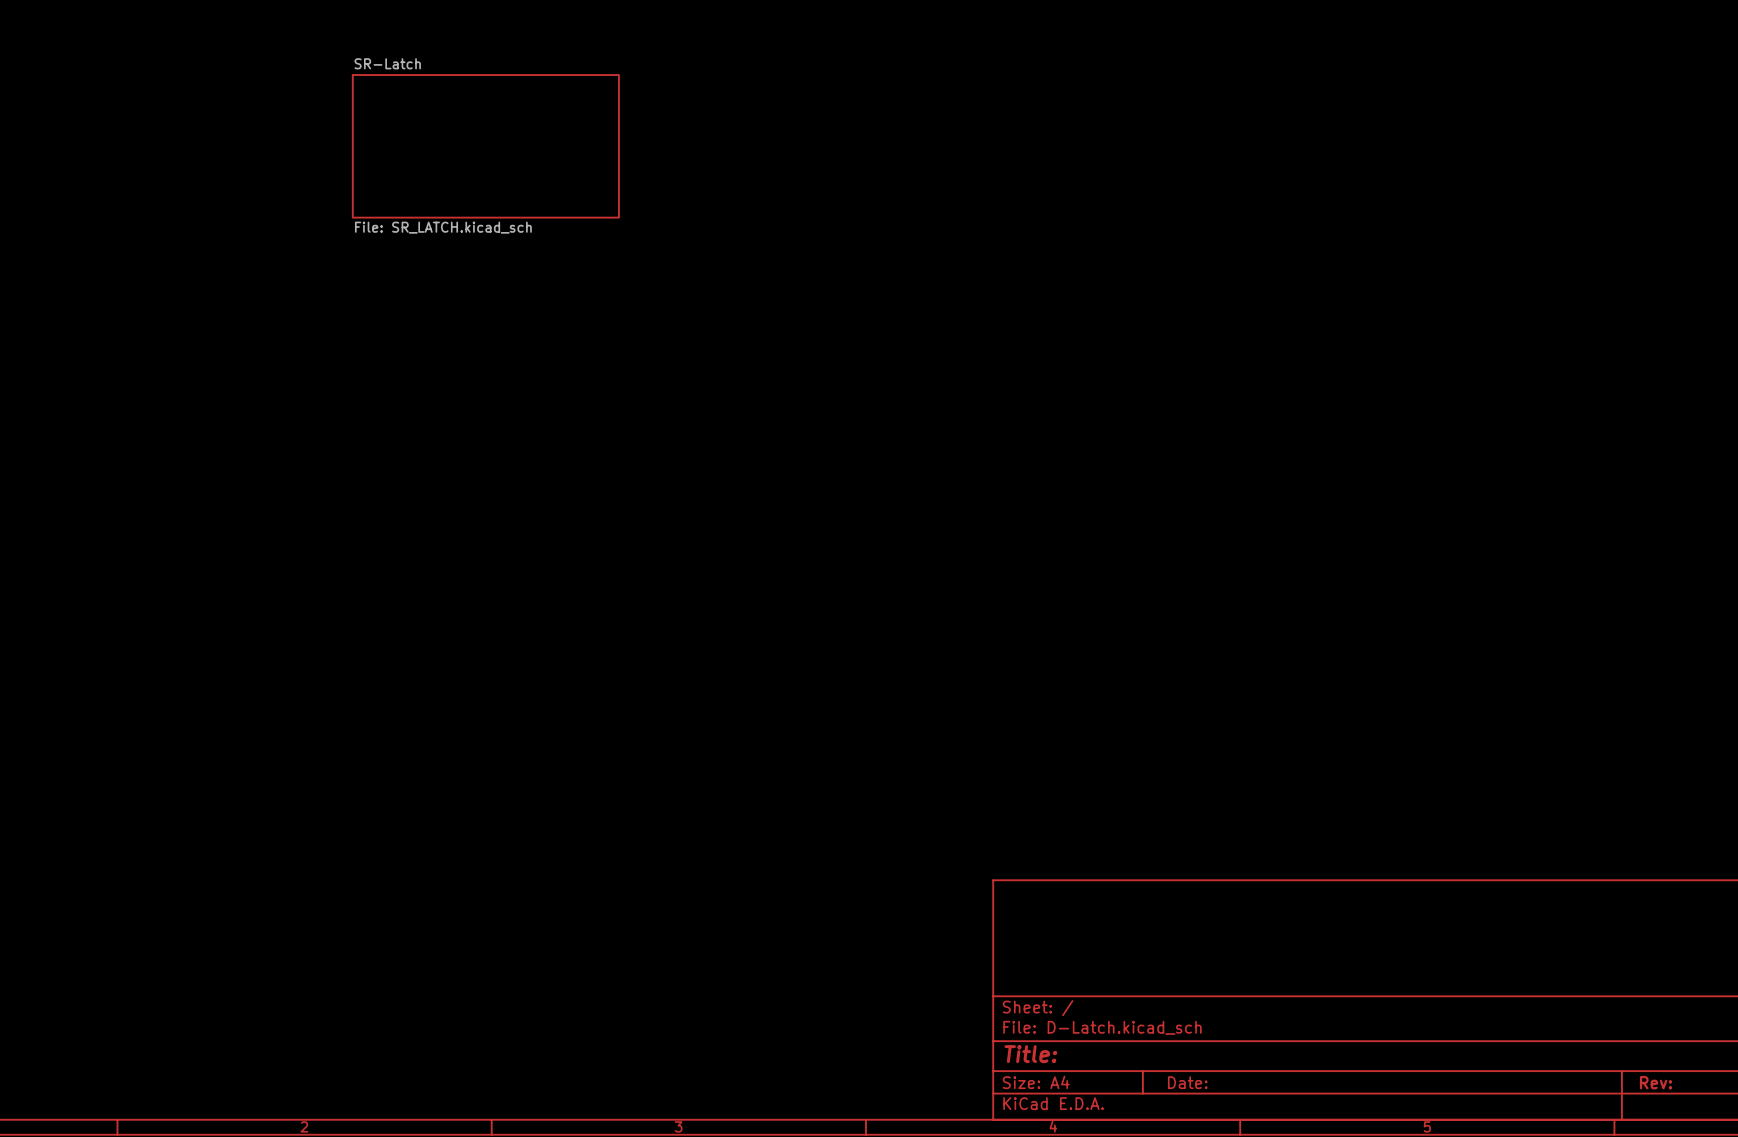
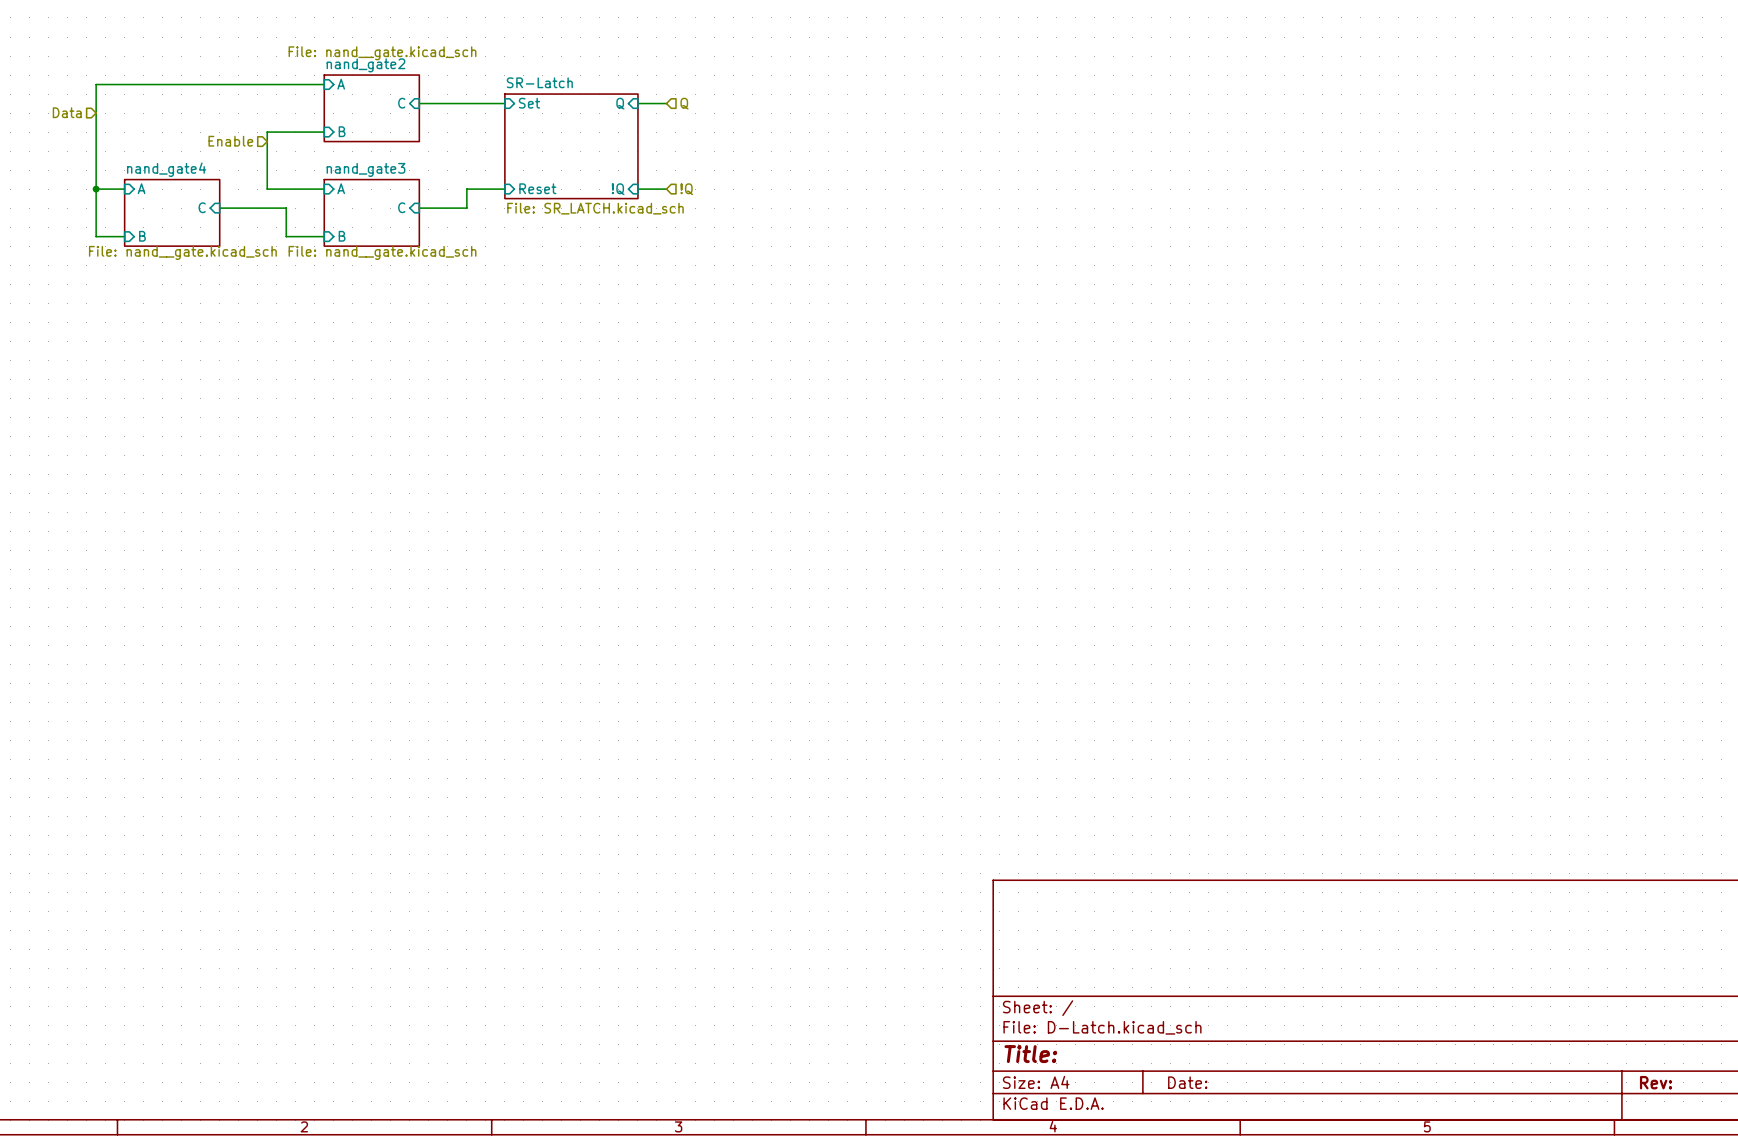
wire: none -> (324, 84) (96, 84) (96, 236) (124, 236)
sheet pin: none -> A (341, 84)
sheet pin: none -> C (401, 103)
wire: none -> (419, 103) (504, 103)
sheet pin: none -> Set (529, 103)
sheet pin: none -> Q (620, 103)
wire: none -> (637, 103) (666, 103)
hierarchical label: none -> Q (684, 103)
sheet nand_gate2: none -> File: nand__gate.kicad_sch (371, 108)
hierarchical label: none -> Data (67, 112)
sheet pin: none -> B (342, 131)
wire: none -> (324, 132) (267, 132) (267, 189) (324, 189)
hierarchical label: none -> Enable (230, 141)
sheet SR-Latch: File: SR_LATCH.kicad_sch (485, 146) -> none
sheet SR-Latch: none -> File: SR_LATCH.kicad_sch (571, 146)
sheet pin: none -> A (141, 188)
sheet pin: none -> A (341, 188)
sheet pin: none -> Reset (537, 188)
wire: none -> (96, 189) (124, 189)
junction: none -> (96, 189)
wire: none -> (504, 189) (466, 189) (466, 208) (419, 208)
sheet pin: none -> !Q (618, 189)
wire: none -> (637, 189) (666, 189)
hierarchical label: none -> !Q (686, 189)
sheet pin: none -> C (202, 207)
sheet pin: none -> C (401, 207)
wire: none -> (219, 208) (286, 208) (286, 236) (324, 236)
sheet nand_gate4: none -> File: nand__gate.kicad_sch (172, 212)
sheet nand_gate3: none -> File: nand__gate.kicad_sch (371, 212)
sheet pin: none -> B (142, 236)
sheet pin: none -> B (342, 236)

